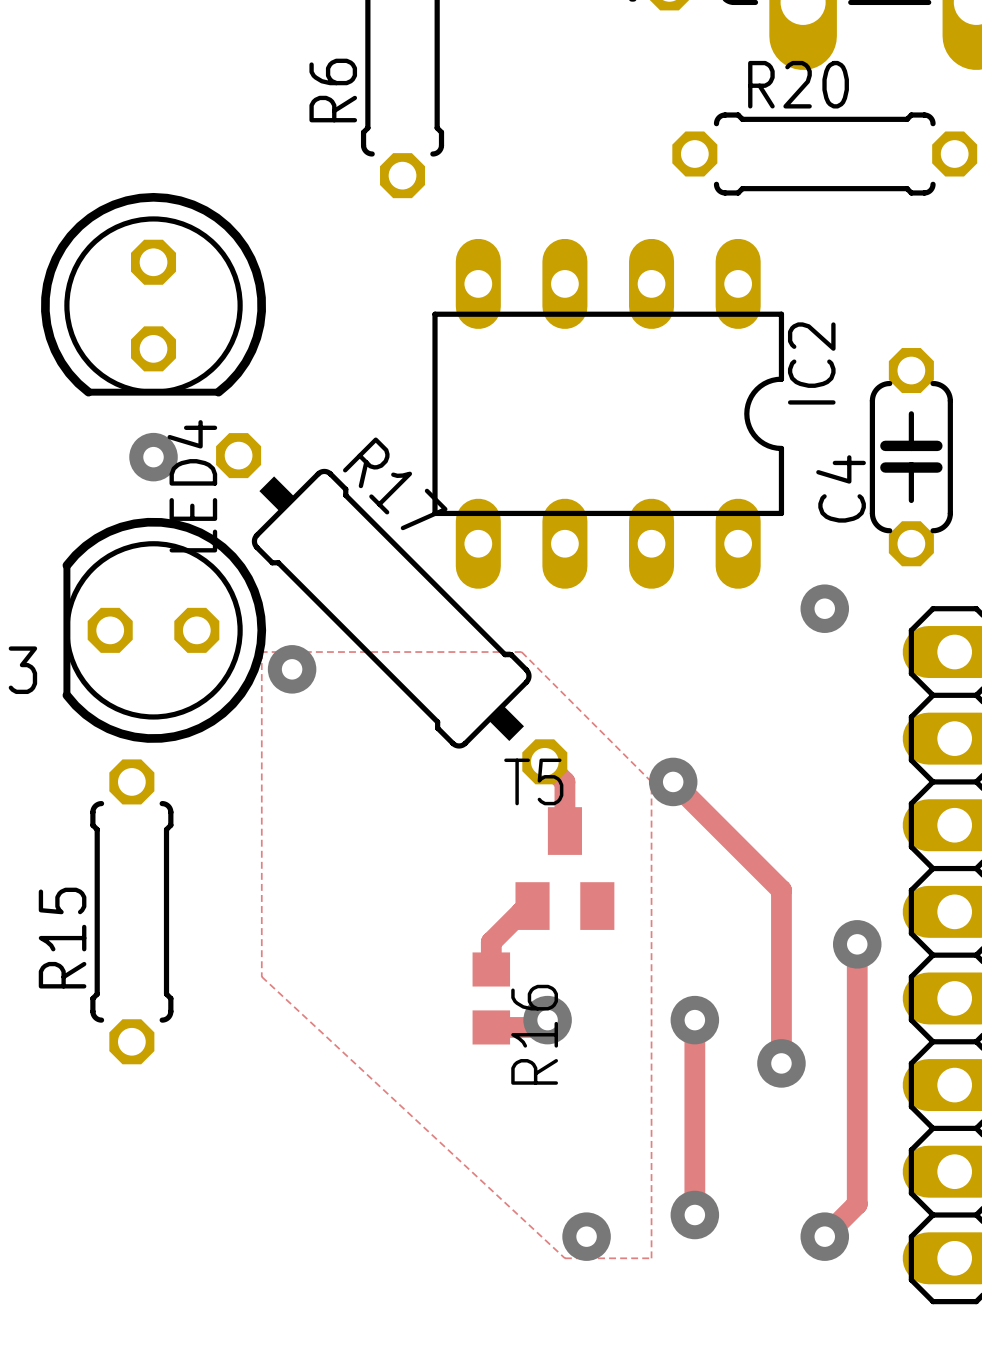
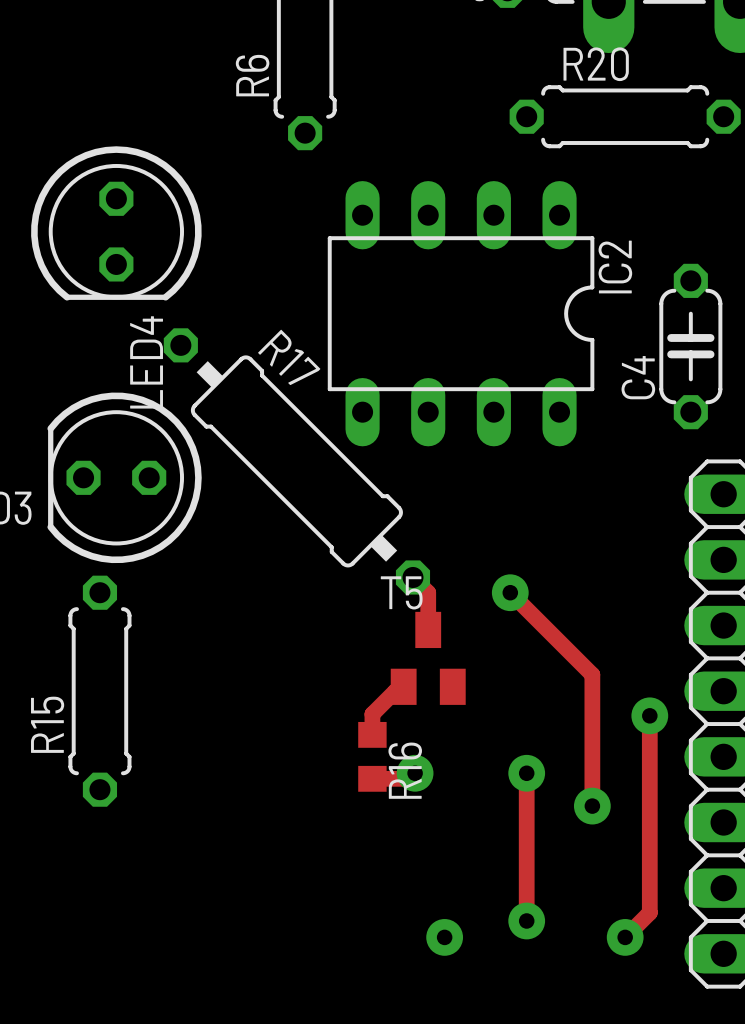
via: (153, 457) -> none
via: (824, 608) -> none
zone outline: (261, 652) (521, 652) (651, 781) (651, 1258) (564, 1258) (261, 976) (261, 652) -> none
via: (292, 669) -> none

